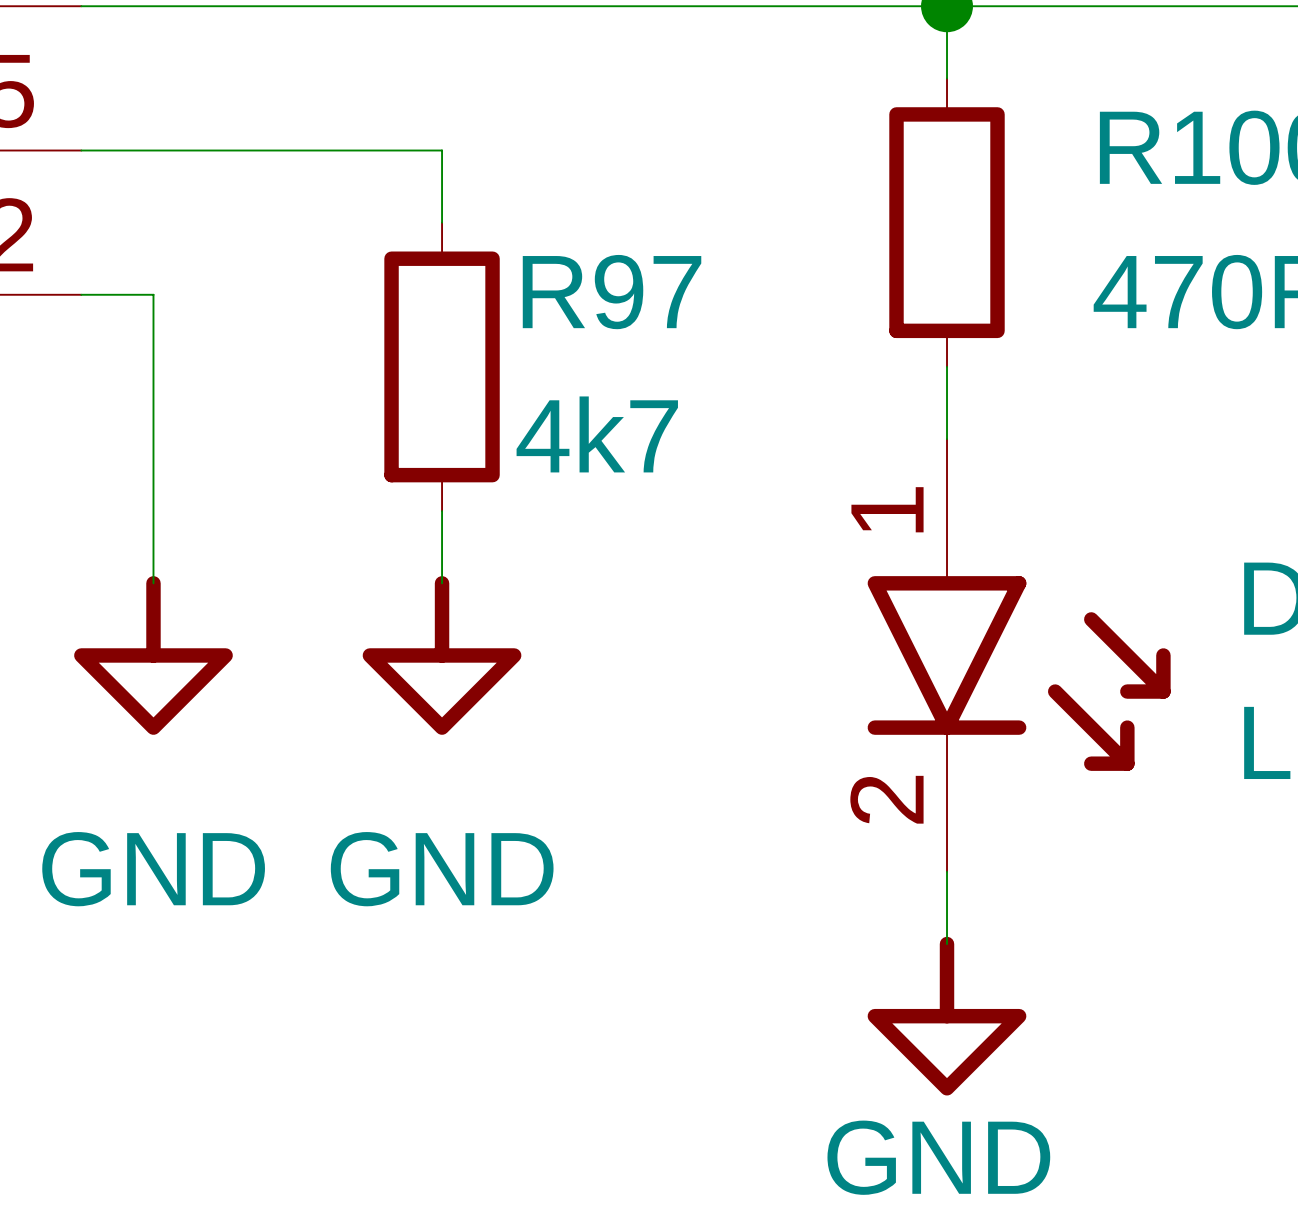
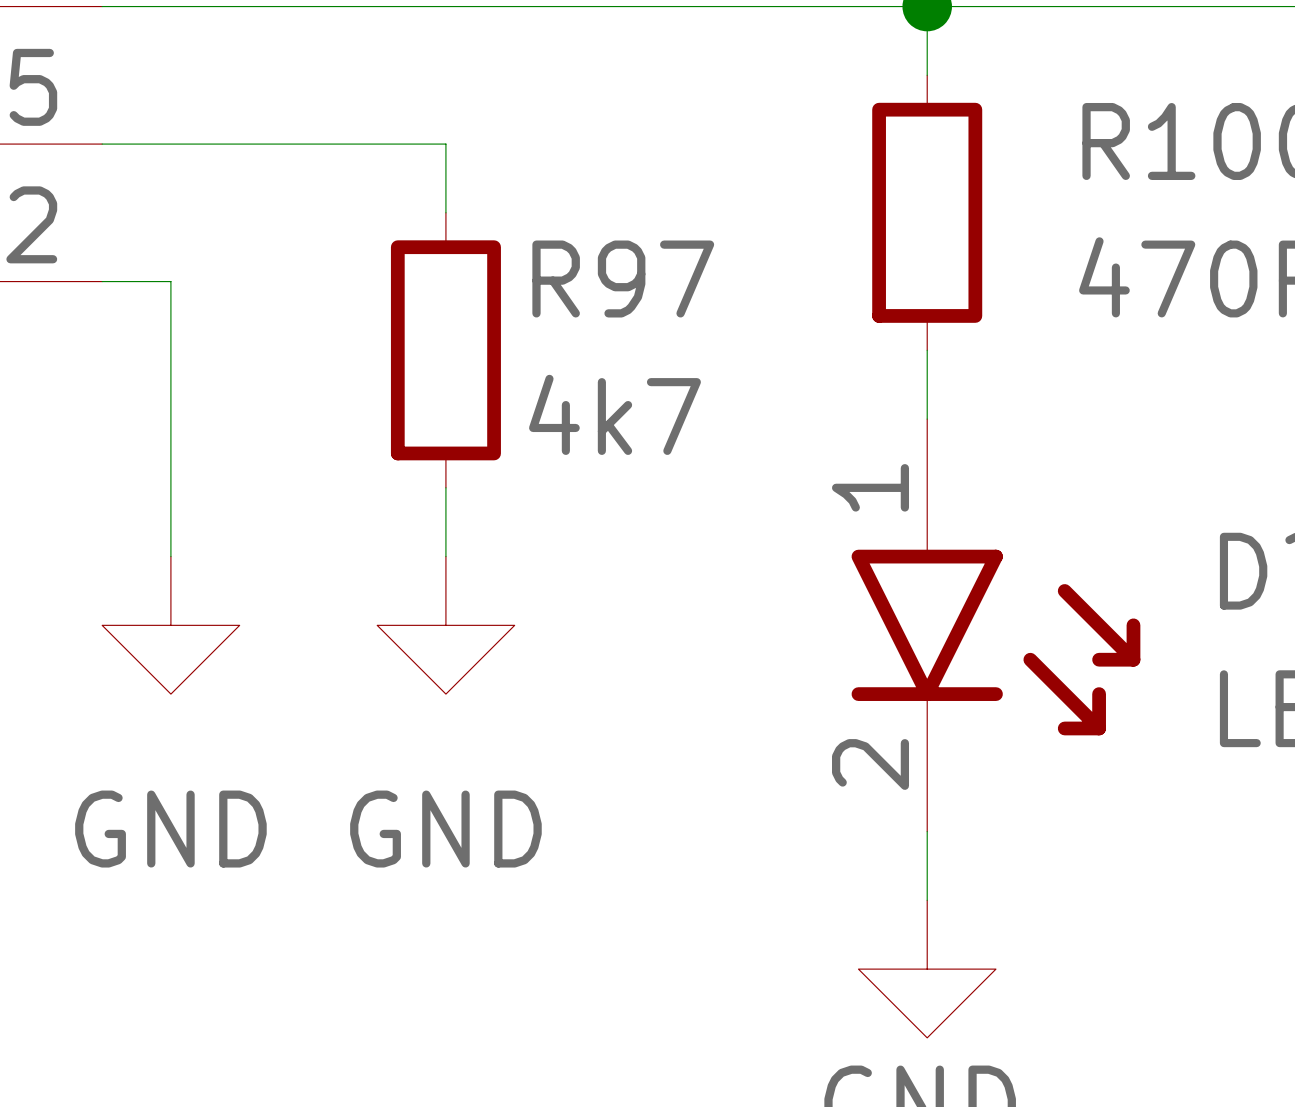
power symbol shape: [74, 576, 233, 735] -> [102, 556, 240, 695]
power symbol shape: [362, 576, 522, 735] -> [377, 556, 515, 695]
power symbol shape: [867, 936, 1027, 1096] -> [858, 900, 996, 1038]

